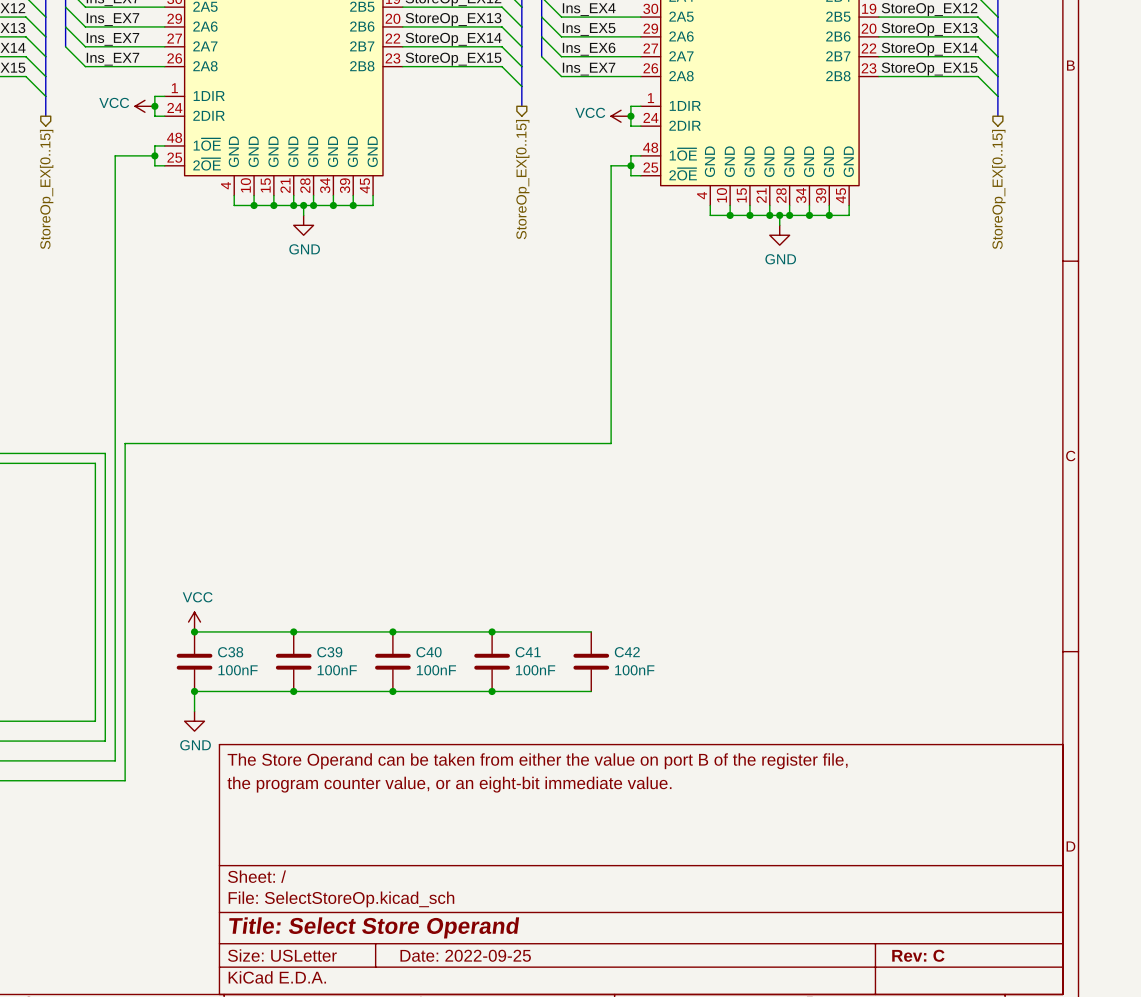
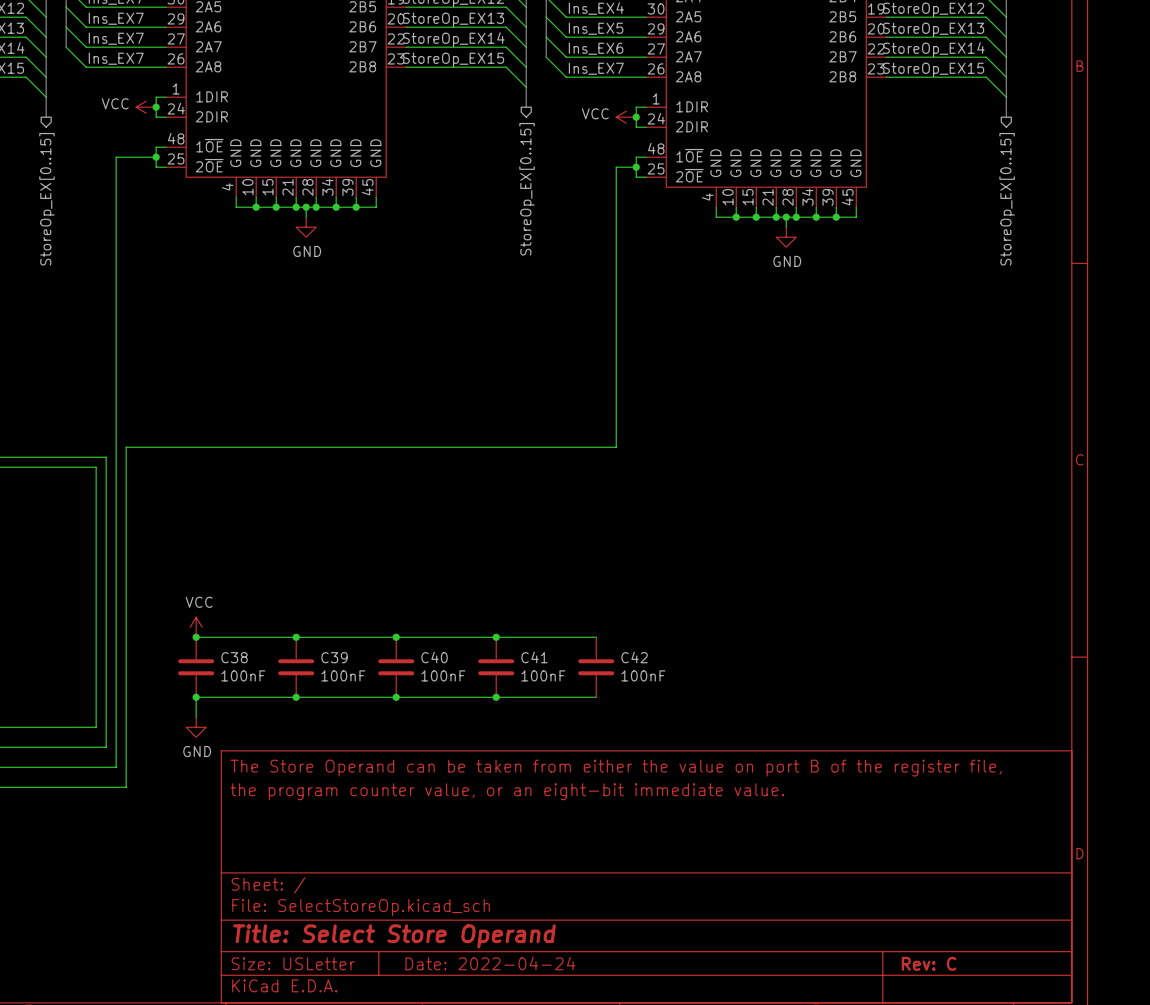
title block: Date: 2022-09-25 (465, 955) -> Date: 2022-04-24 (490, 963)

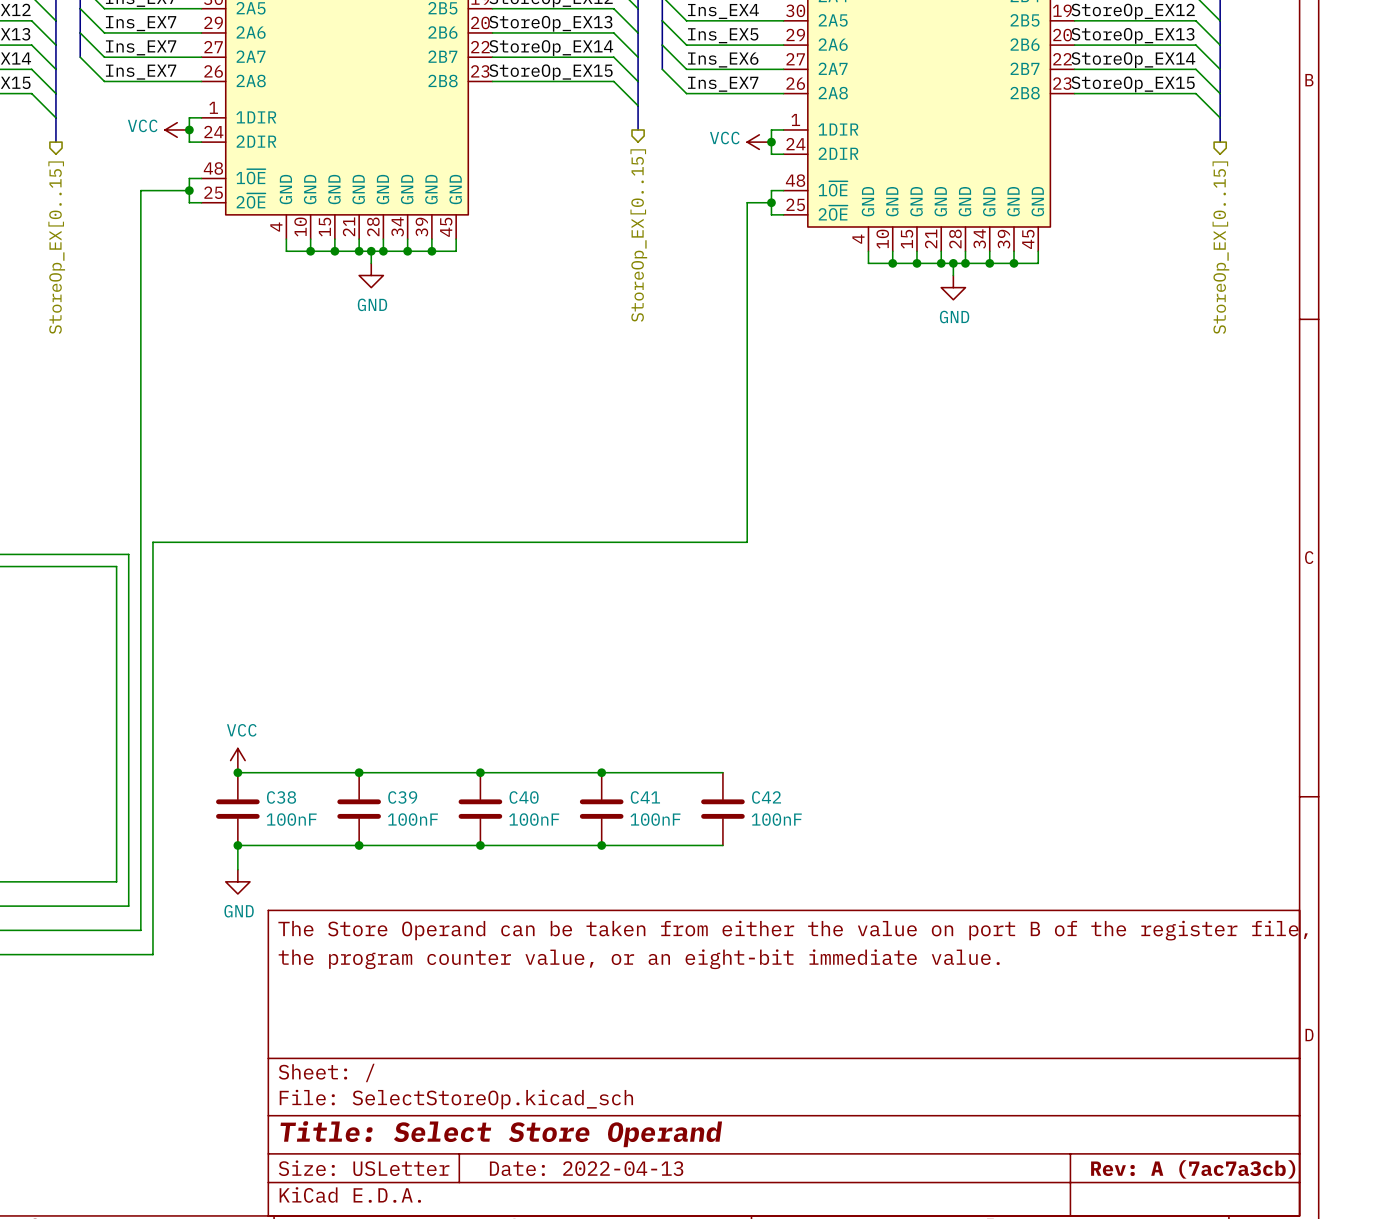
title block: Date: 2022-04-24 (490, 963) -> Date: 2022-04-13 (586, 1168)
title block: Rev: C (929, 963) -> Rev: A (7ac7a3cb) (1193, 1169)

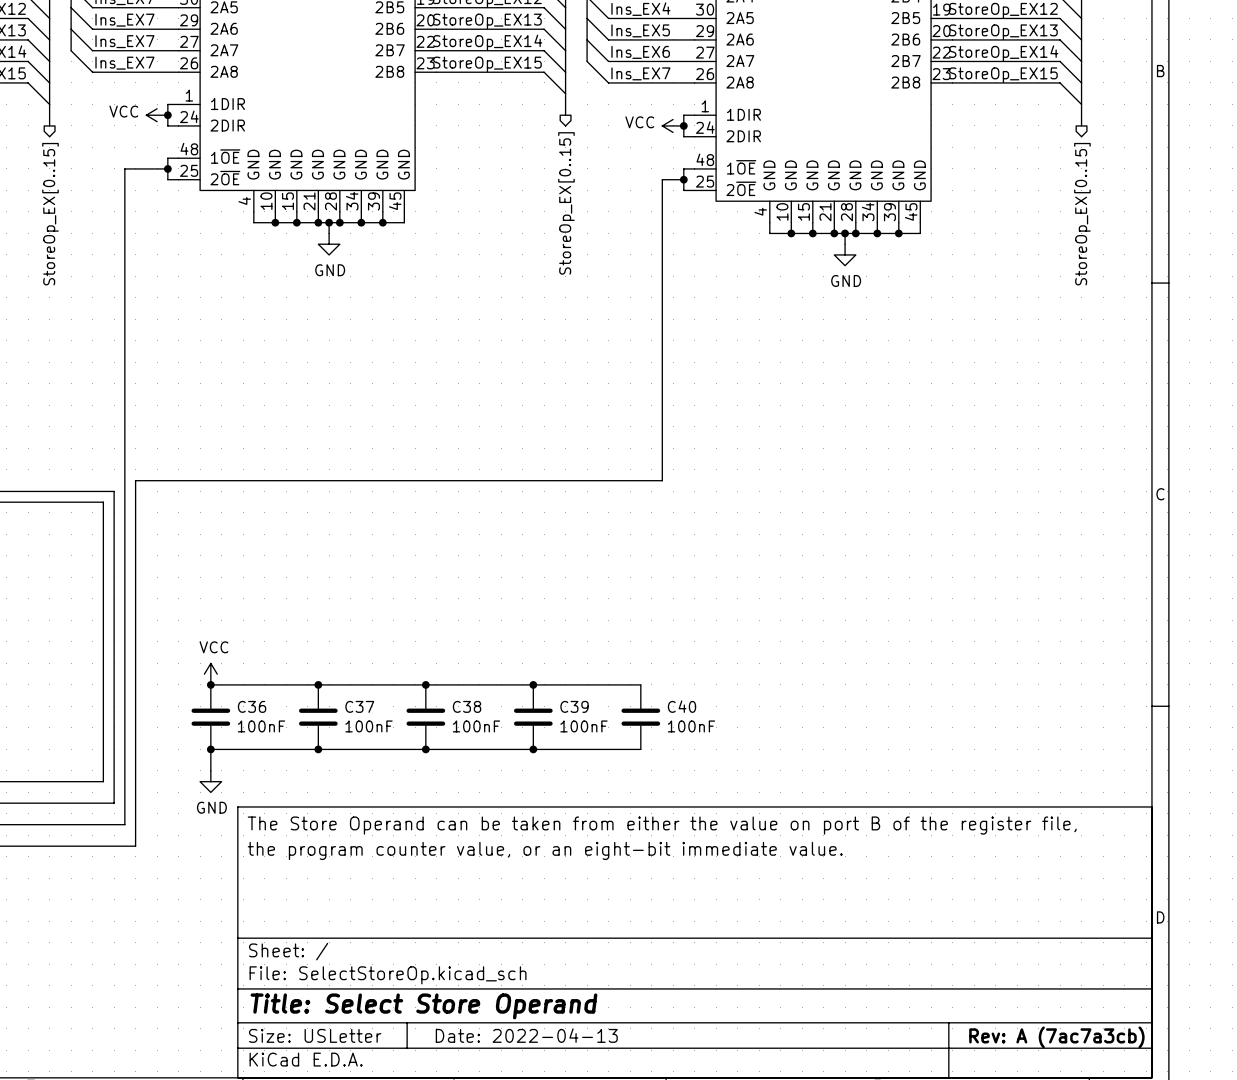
C38 name: C38 (281, 797) -> C36 (252, 706)
C39 name: C39 (402, 797) -> C37 (359, 706)
C40 name: C40 (524, 797) -> C38 (467, 706)
C41 name: C41 (645, 797) -> C39 (574, 706)
C42 name: C42 (766, 797) -> C40 (682, 706)

